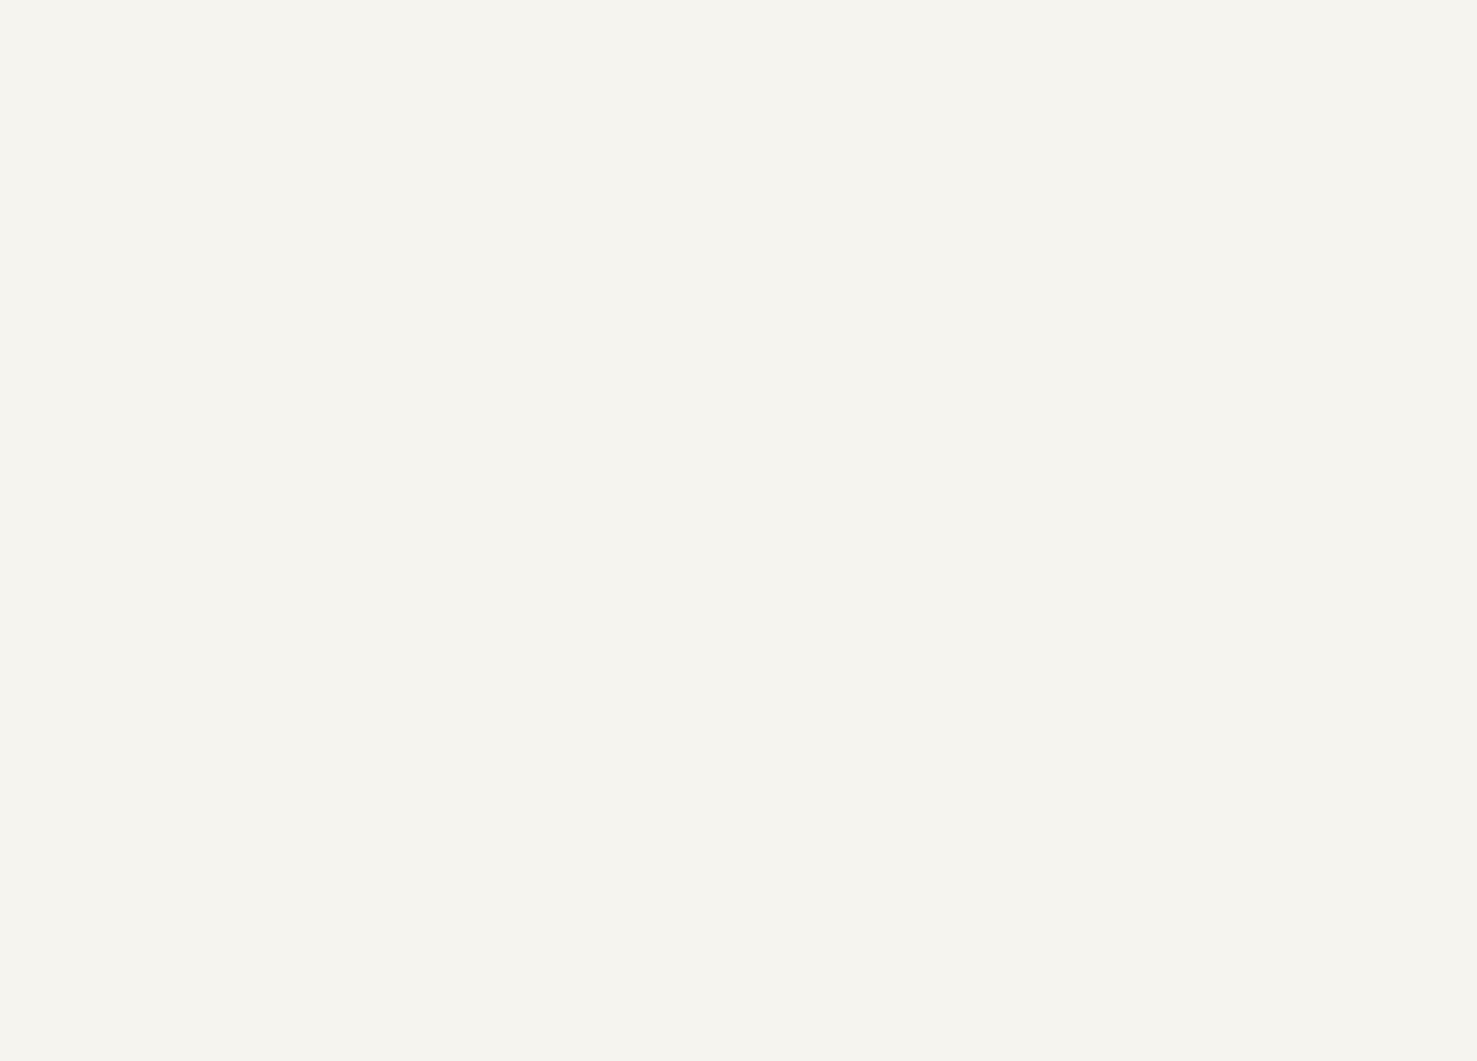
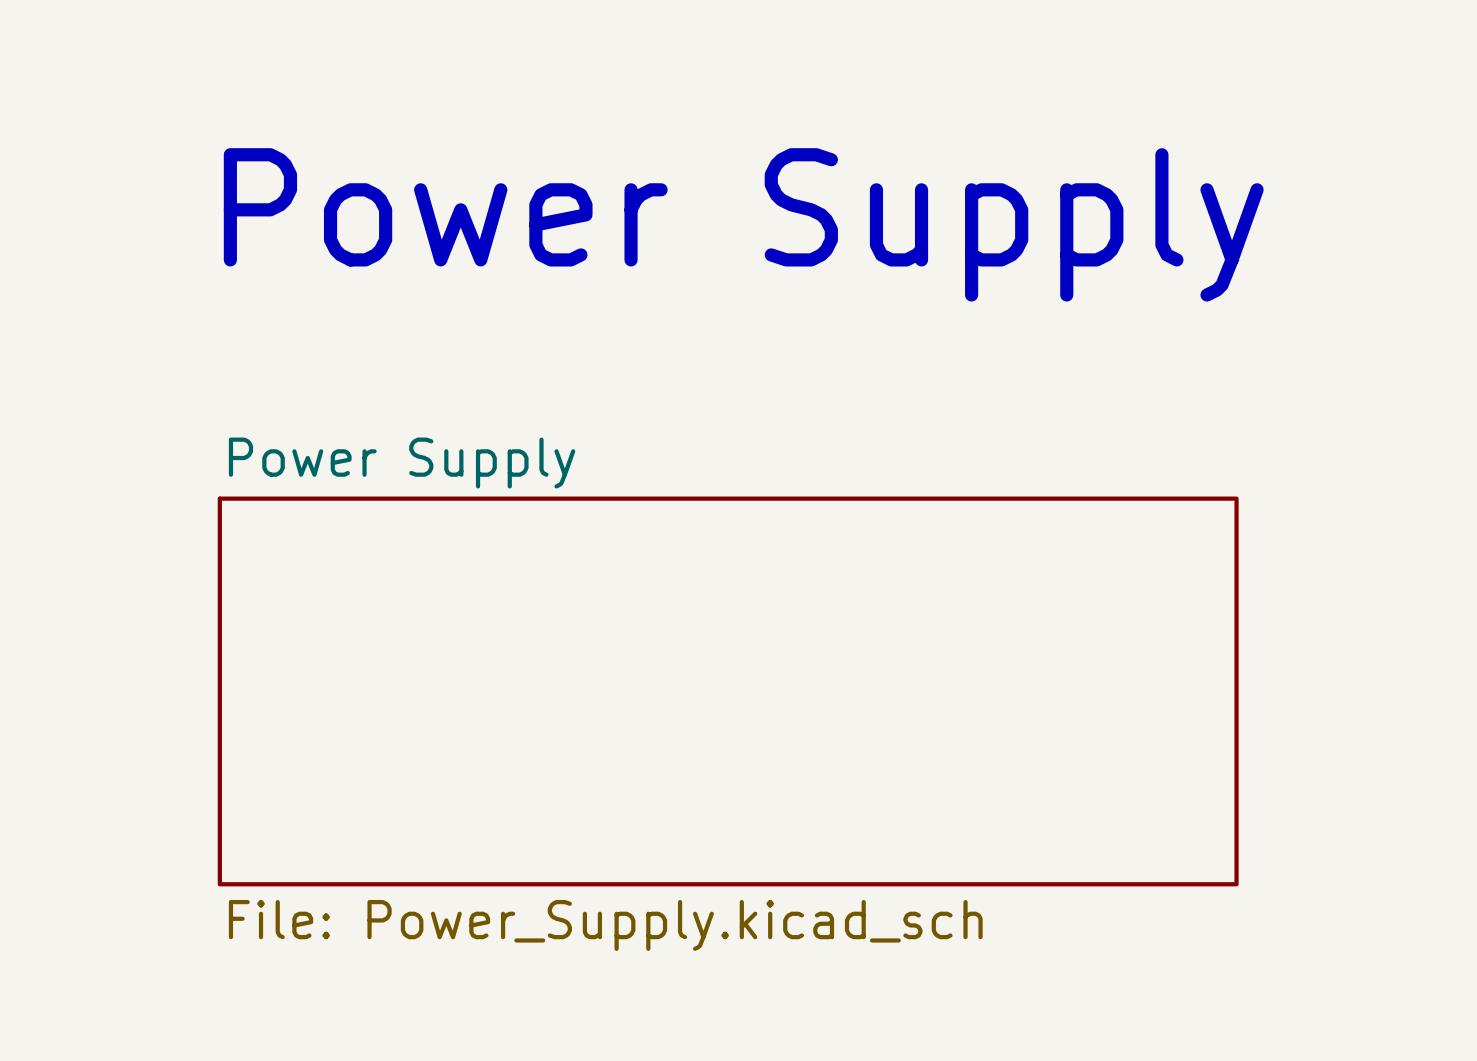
text: none -> Power Supply (743, 224)
sheet Power Supply: none -> File: Power_Supply.kicad_sch (728, 691)

